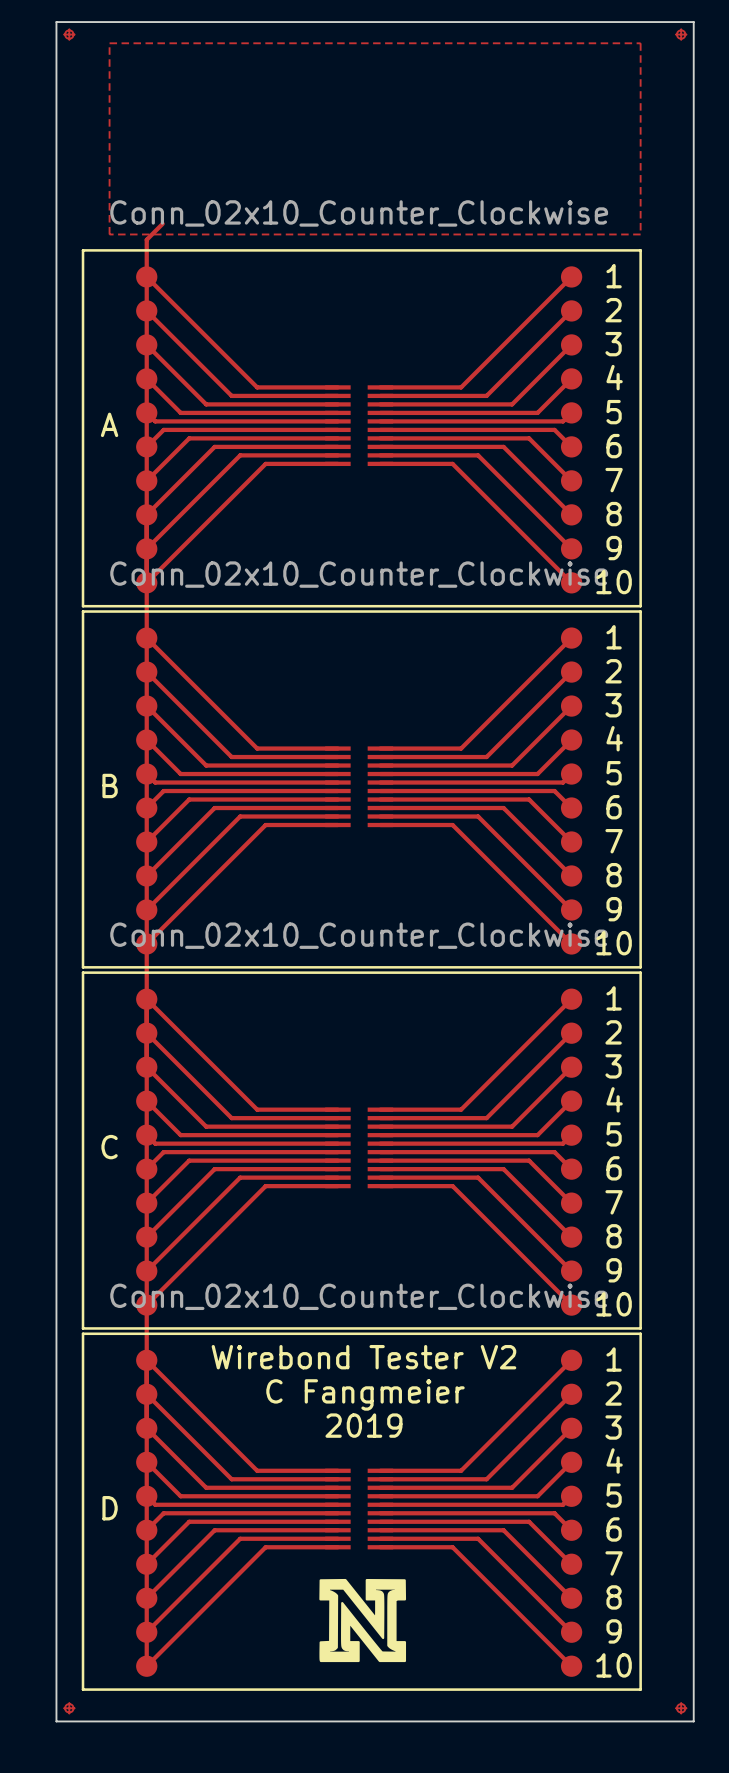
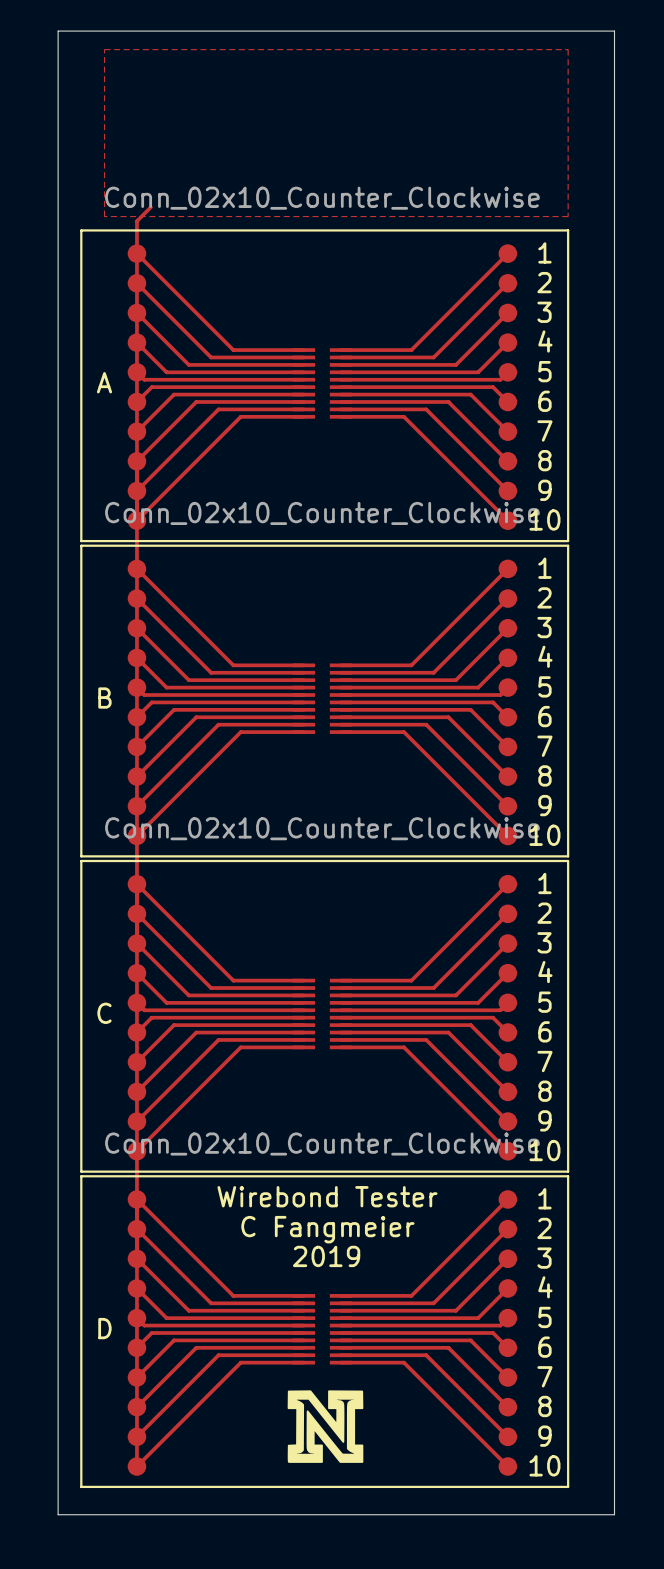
drawing: [63, 28, 76, 41] -> none
drawing: [675, 28, 688, 41] -> none
text: Wirebond Tester V2 (363, 1357) -> Wirebond Tester (327, 1196)
drawing: [63, 1702, 76, 1715] -> none
drawing: [675, 1702, 688, 1715] -> none

